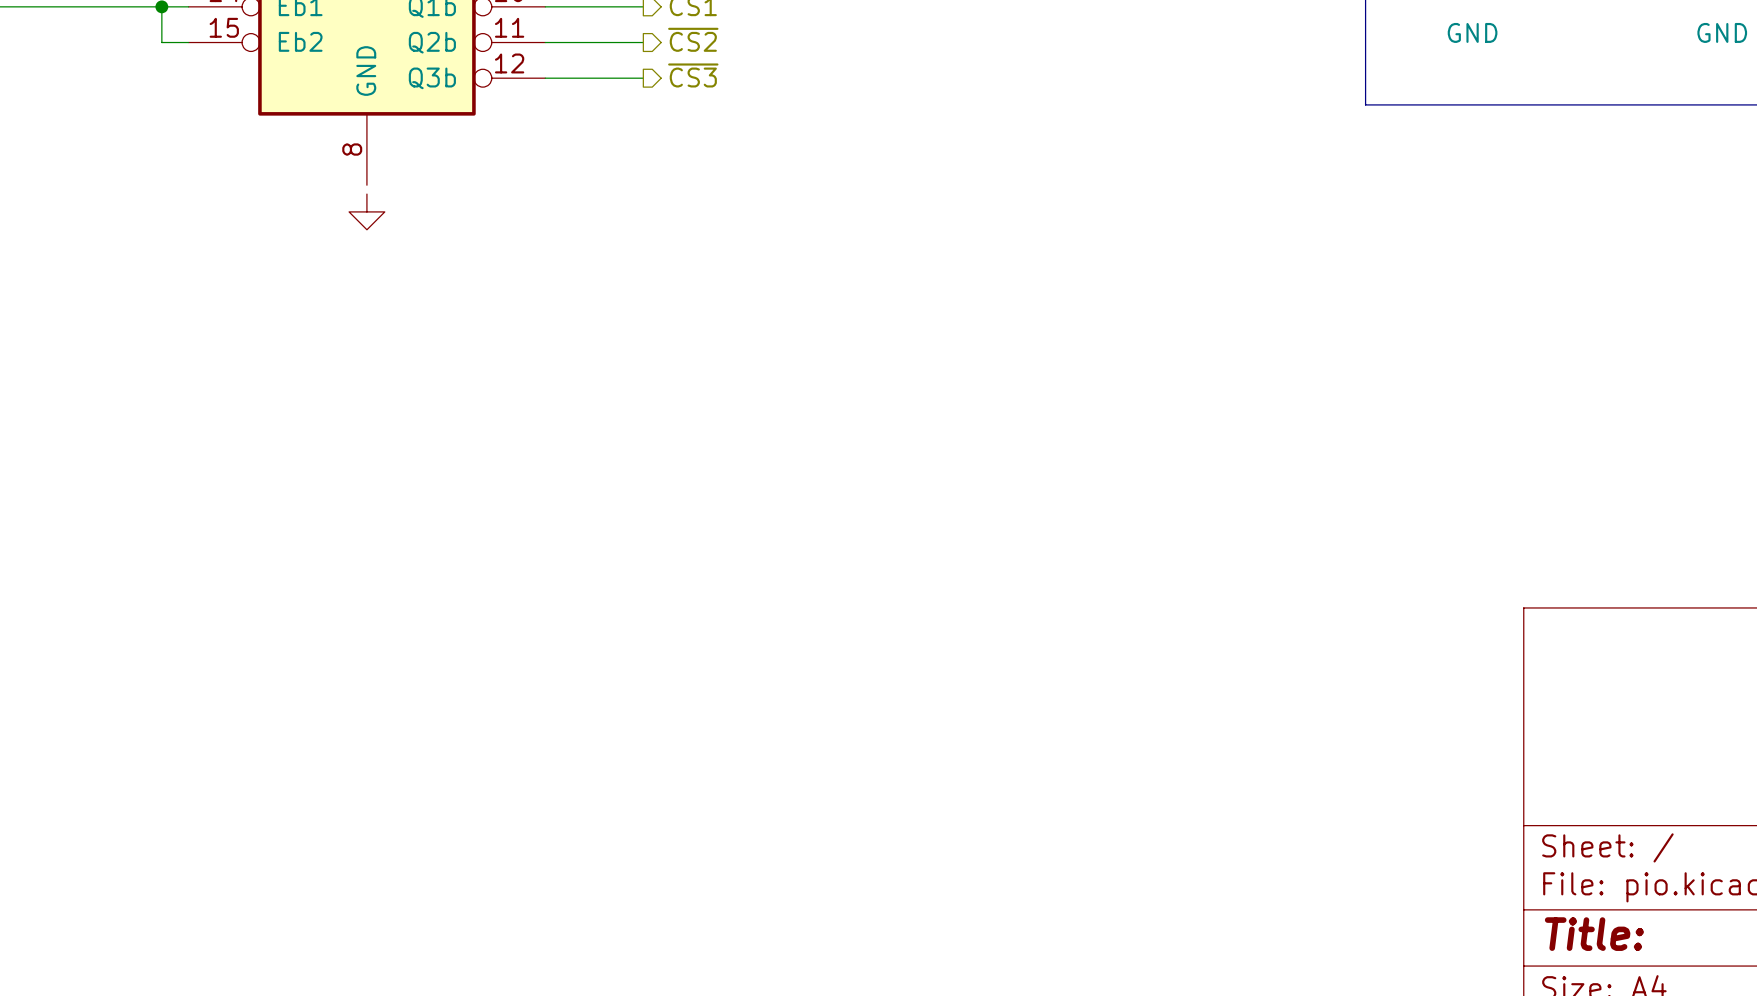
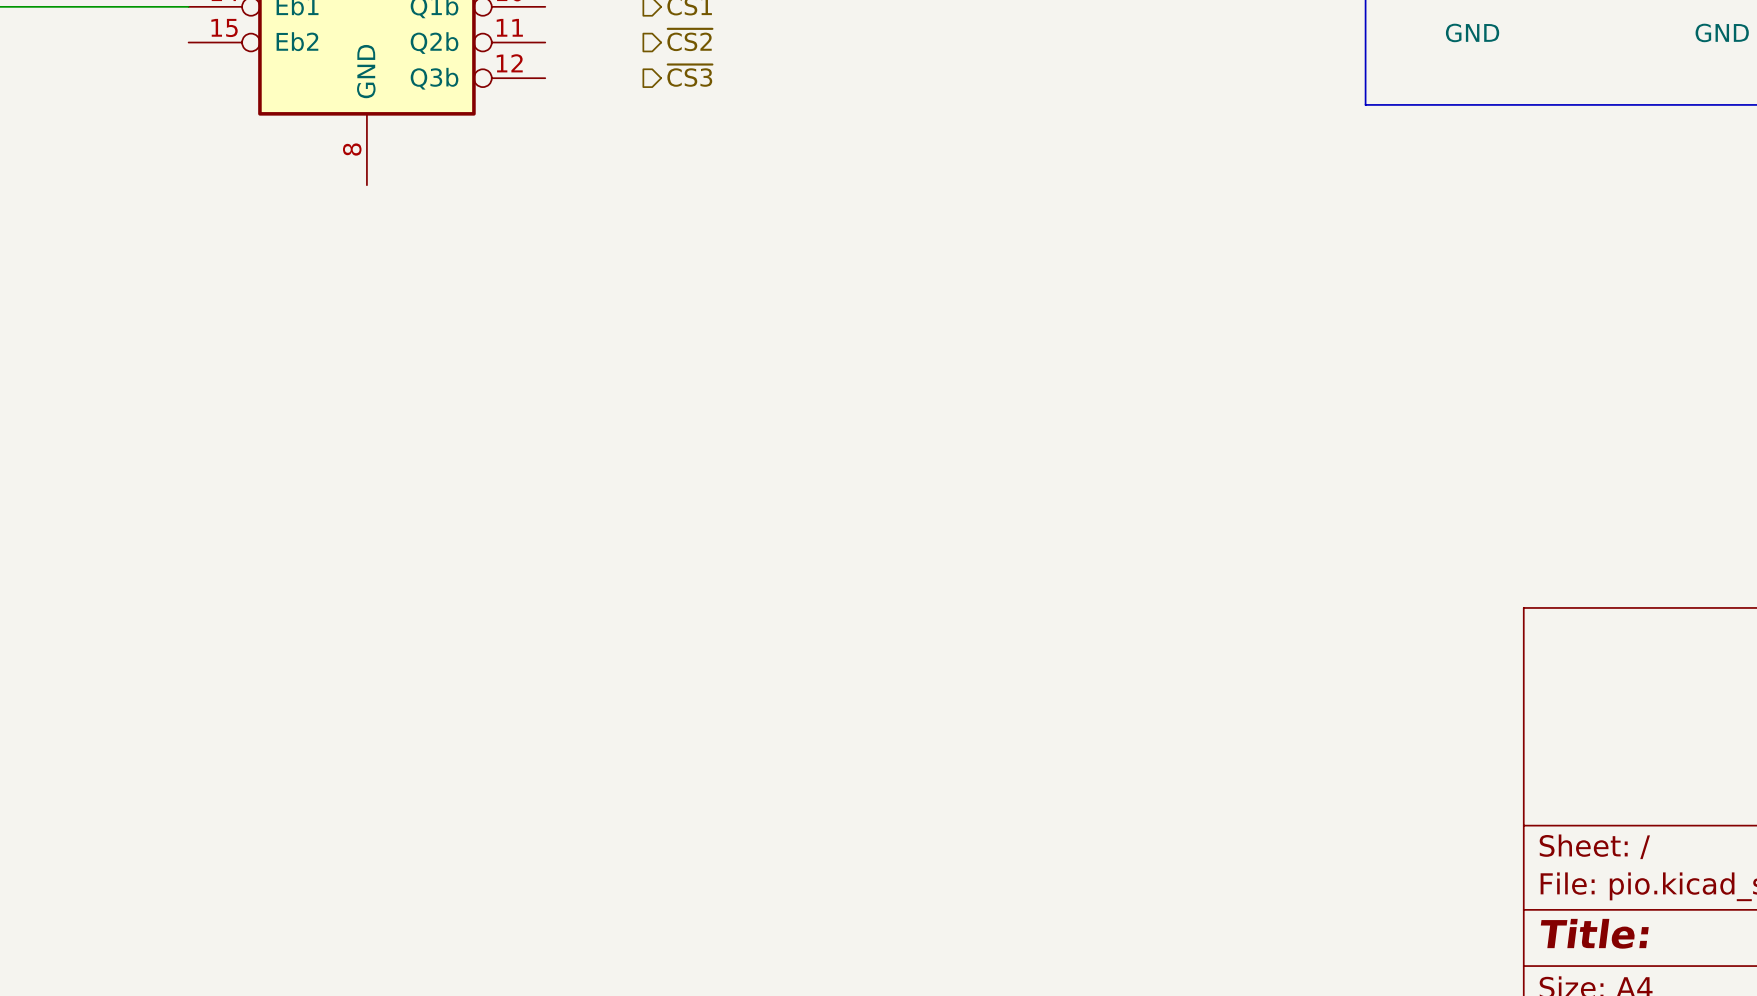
wire: (161, 6) (161, 42) (188, 42) -> none
junction: (161, 6) -> none
wire: (545, 6) (643, 6) -> none
wire: (545, 42) (643, 42) -> none
wire: (545, 78) (643, 78) -> none
power symbol: (366, 211) -> none

